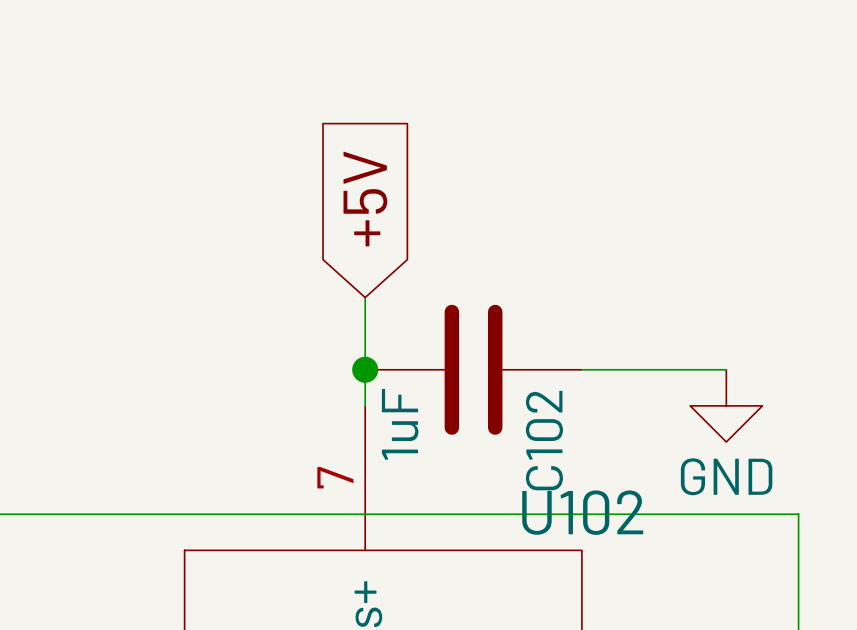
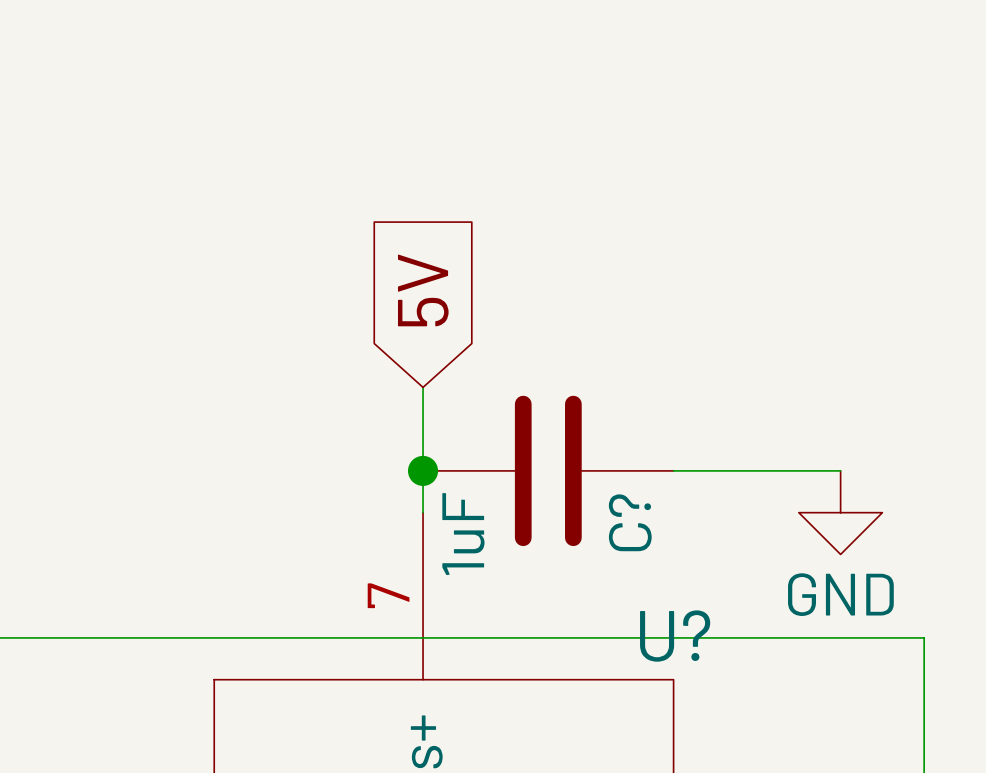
global label: +5V (365, 198) -> 5V (423, 290)
C102 name: C102 (544, 440) -> C? (630, 522)
U102 name: U102 (582, 512) -> U? (675, 636)

